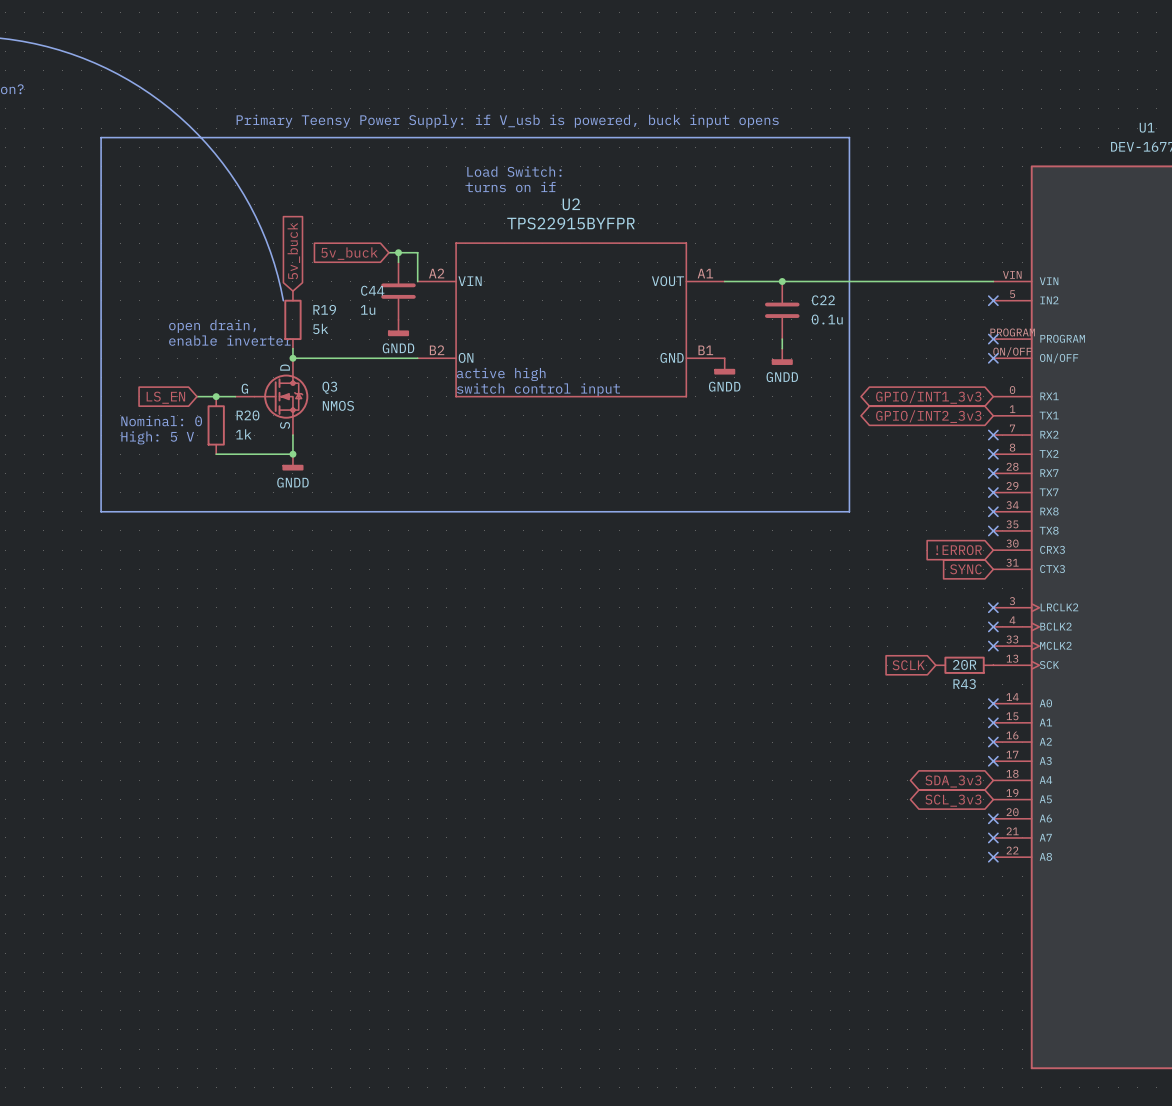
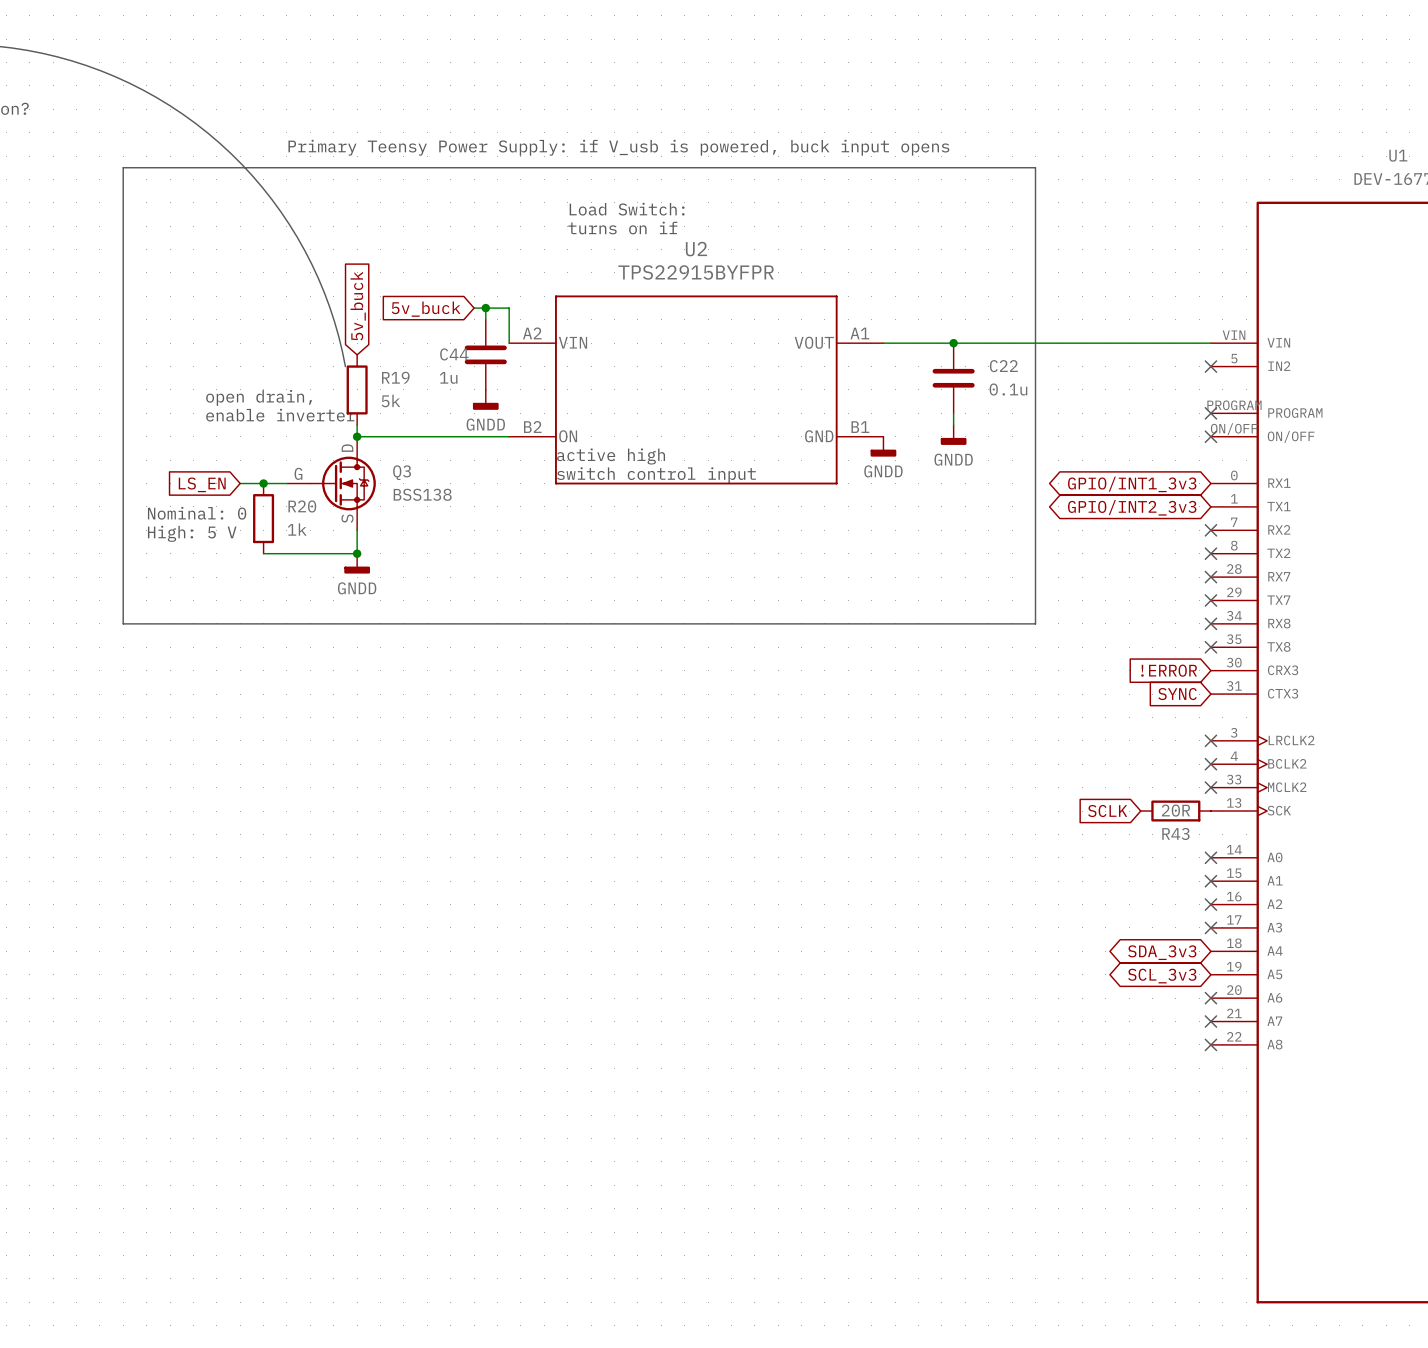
Q3 value: NMOS (338, 405) -> BSS138 (422, 494)

